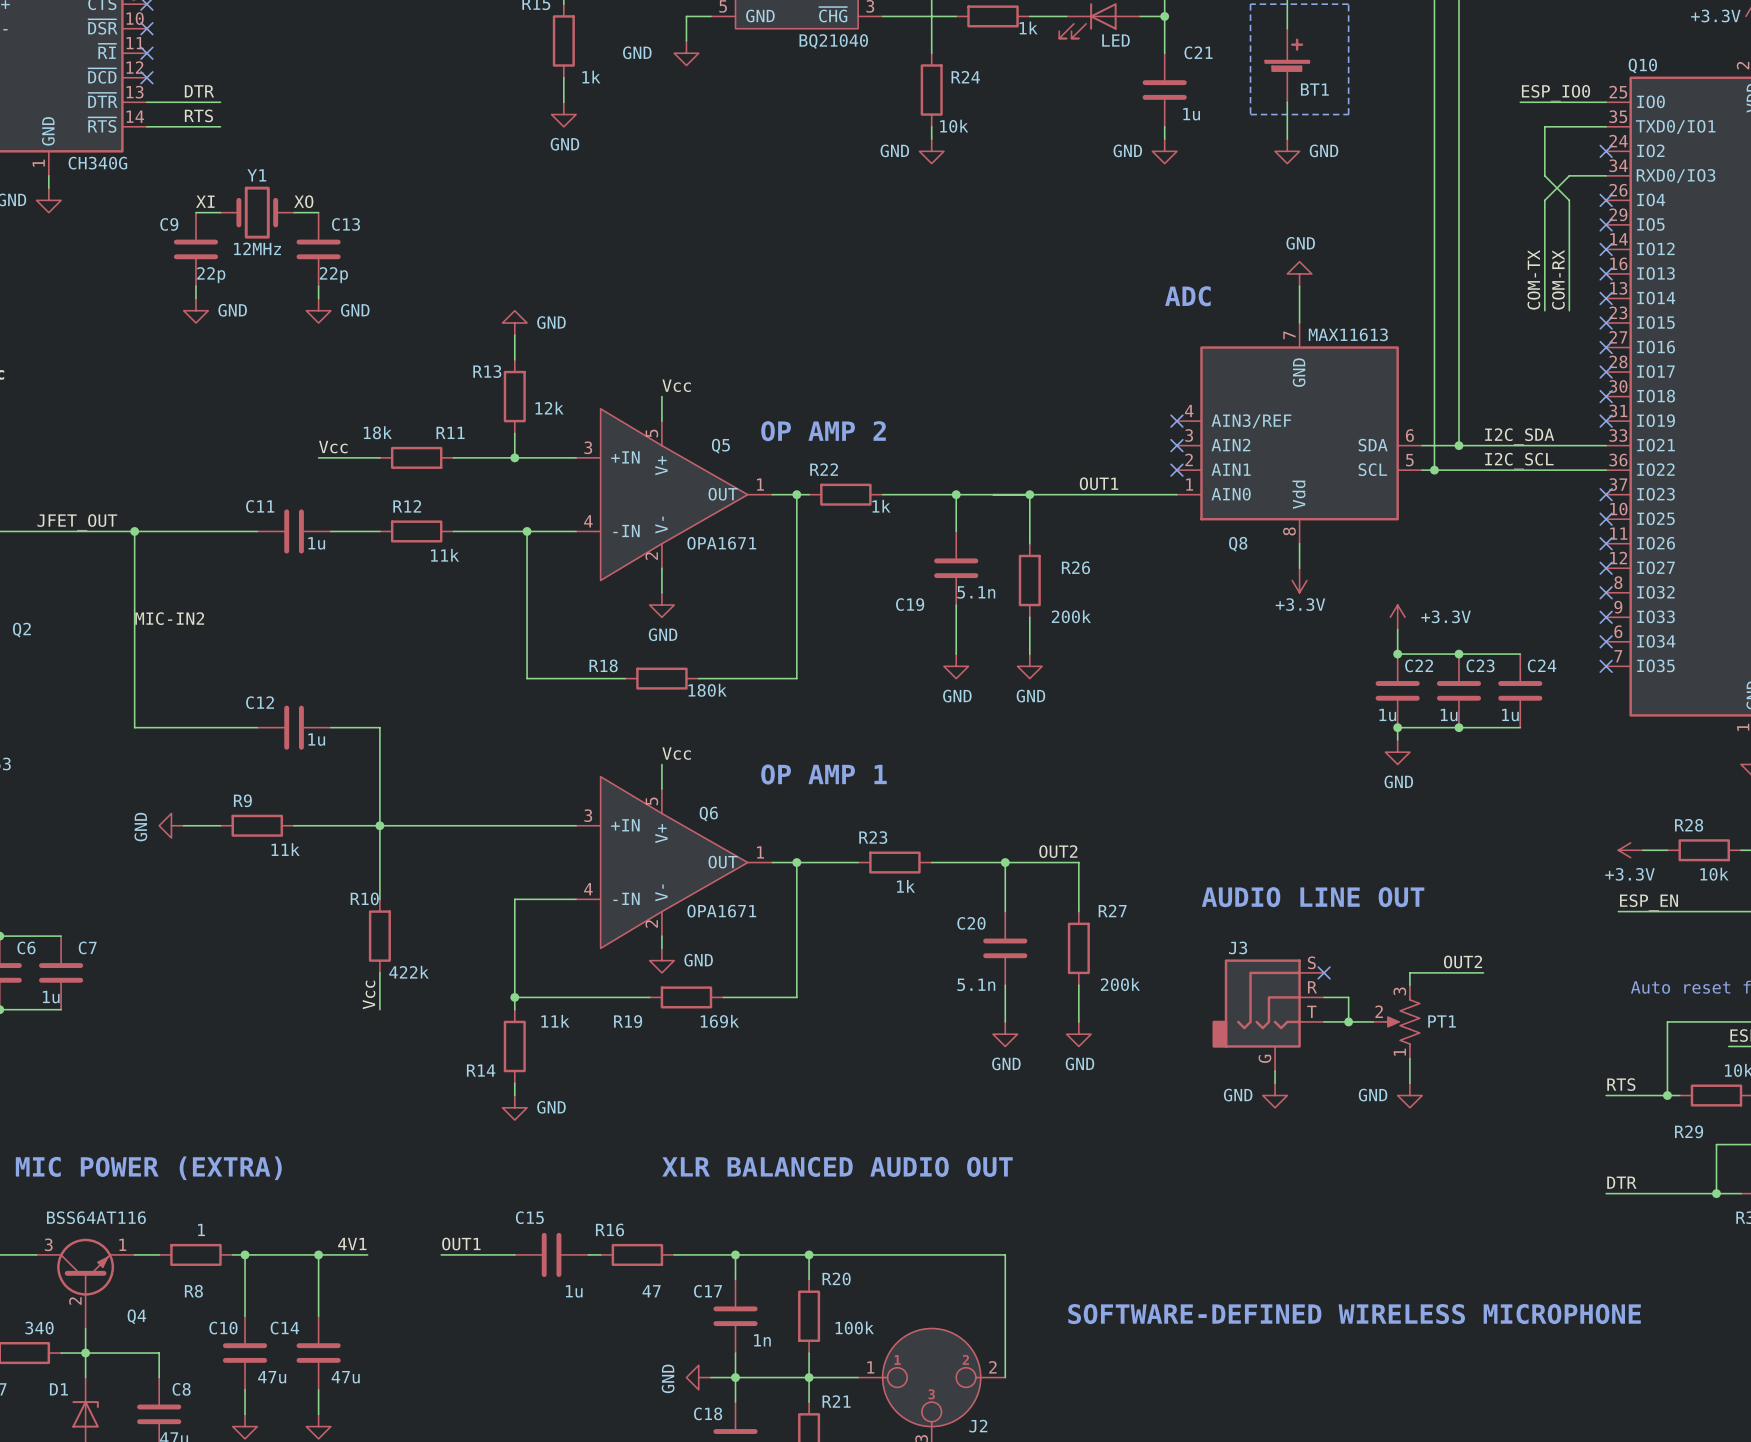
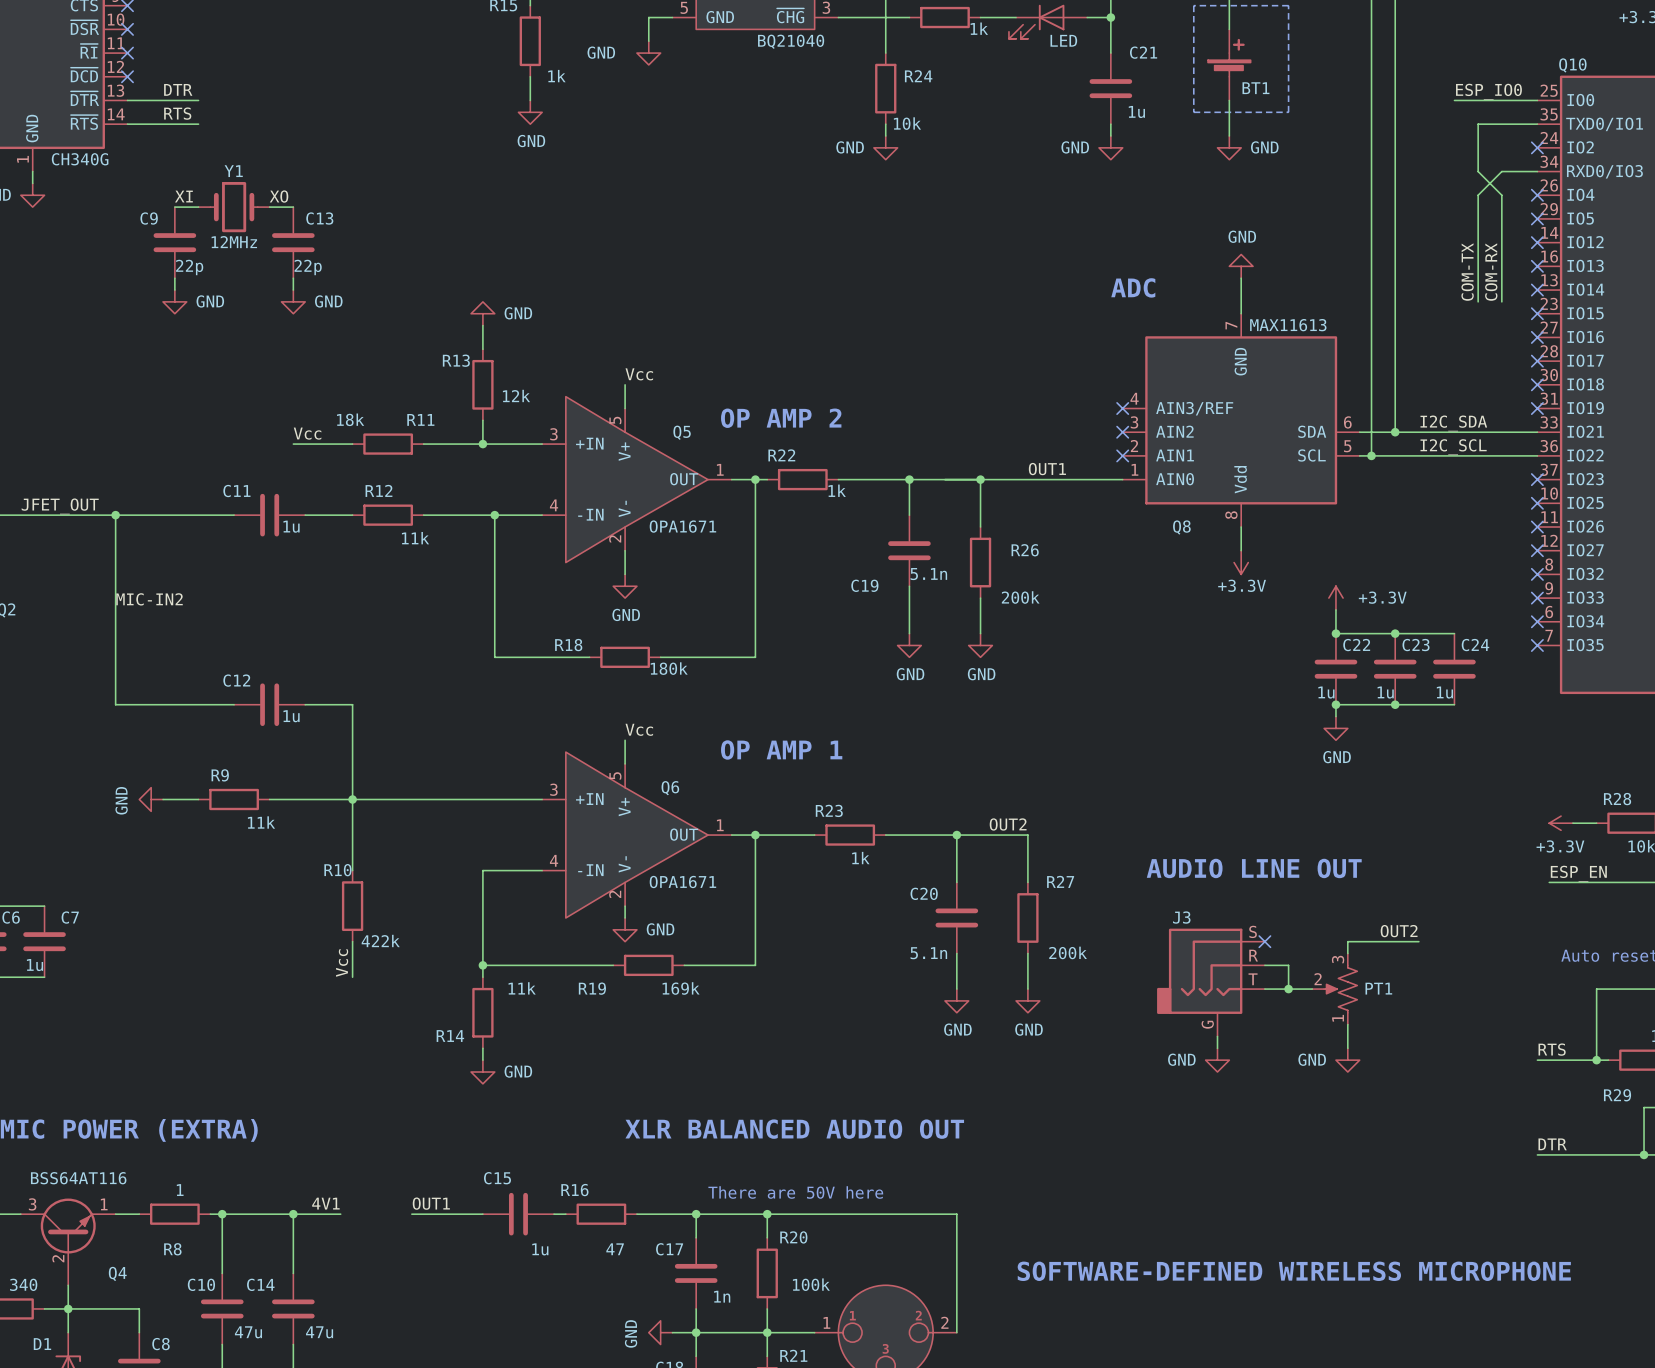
text: none -> There are 50V here (795, 1192)

